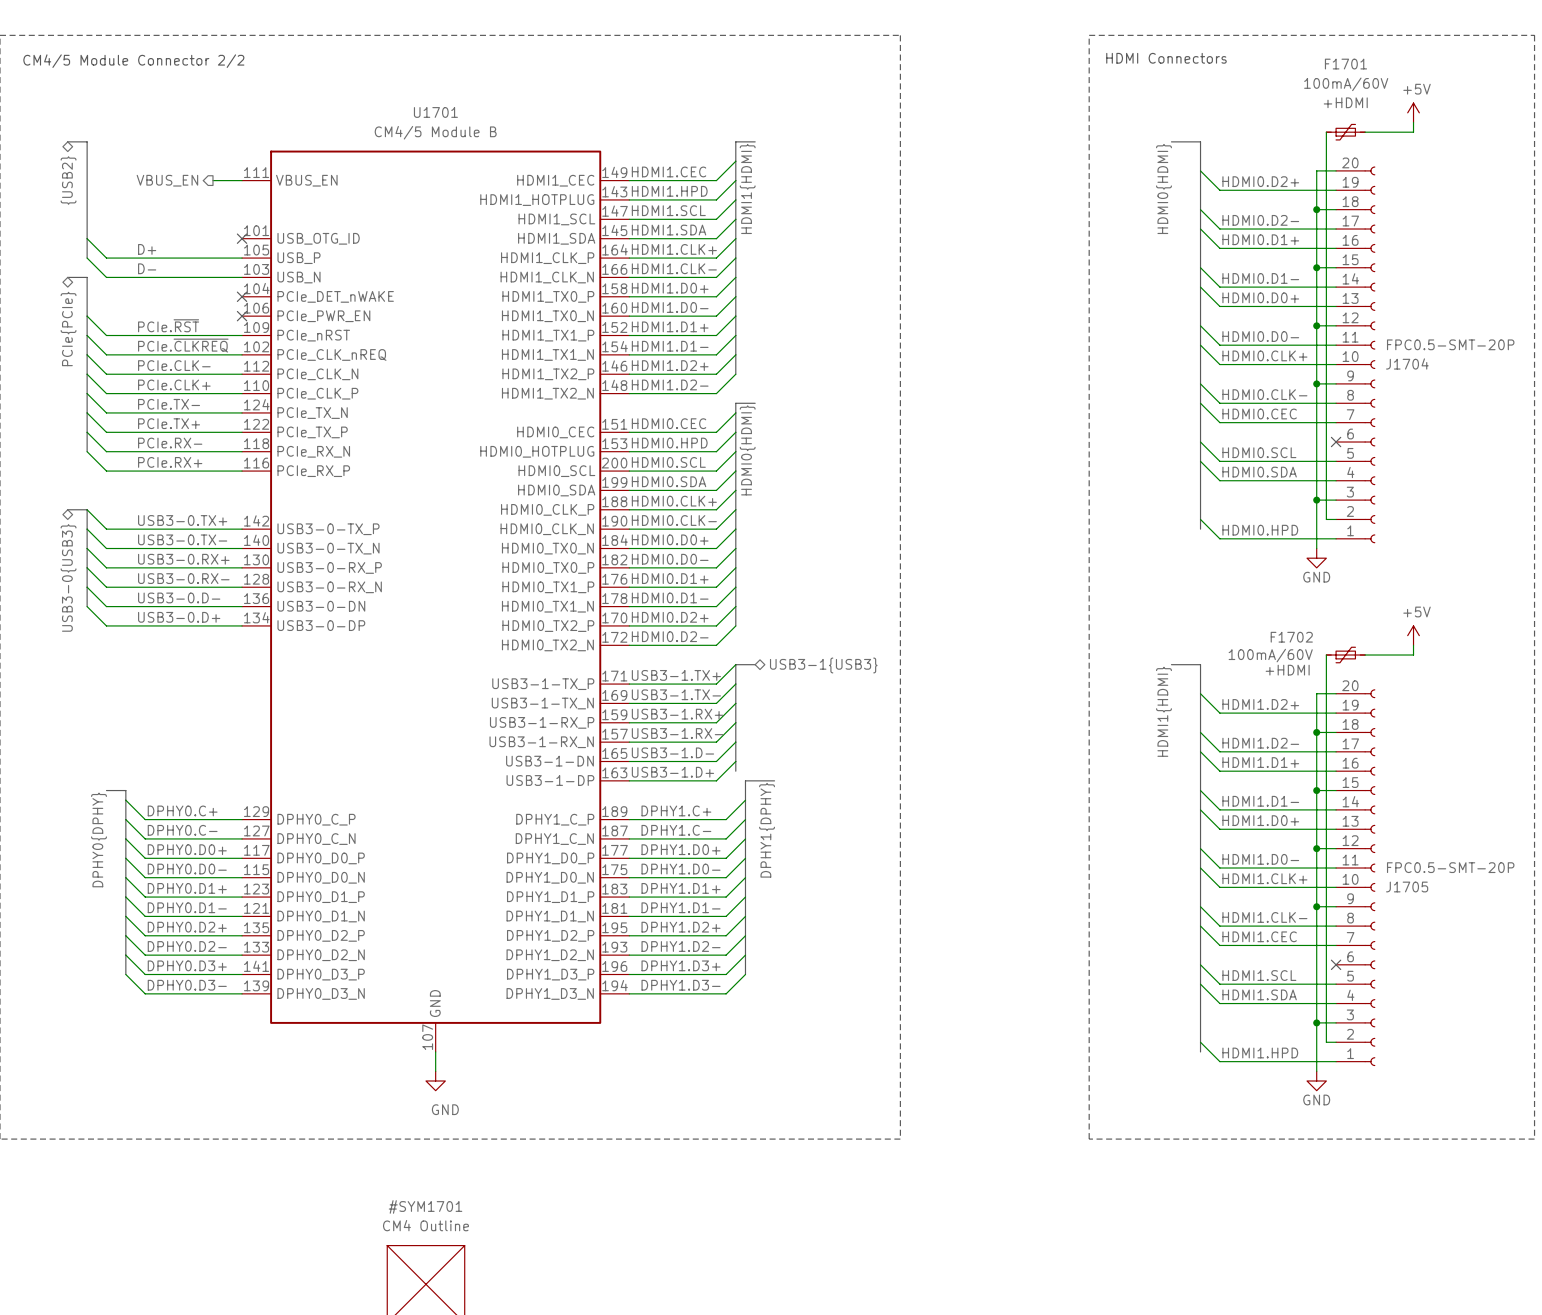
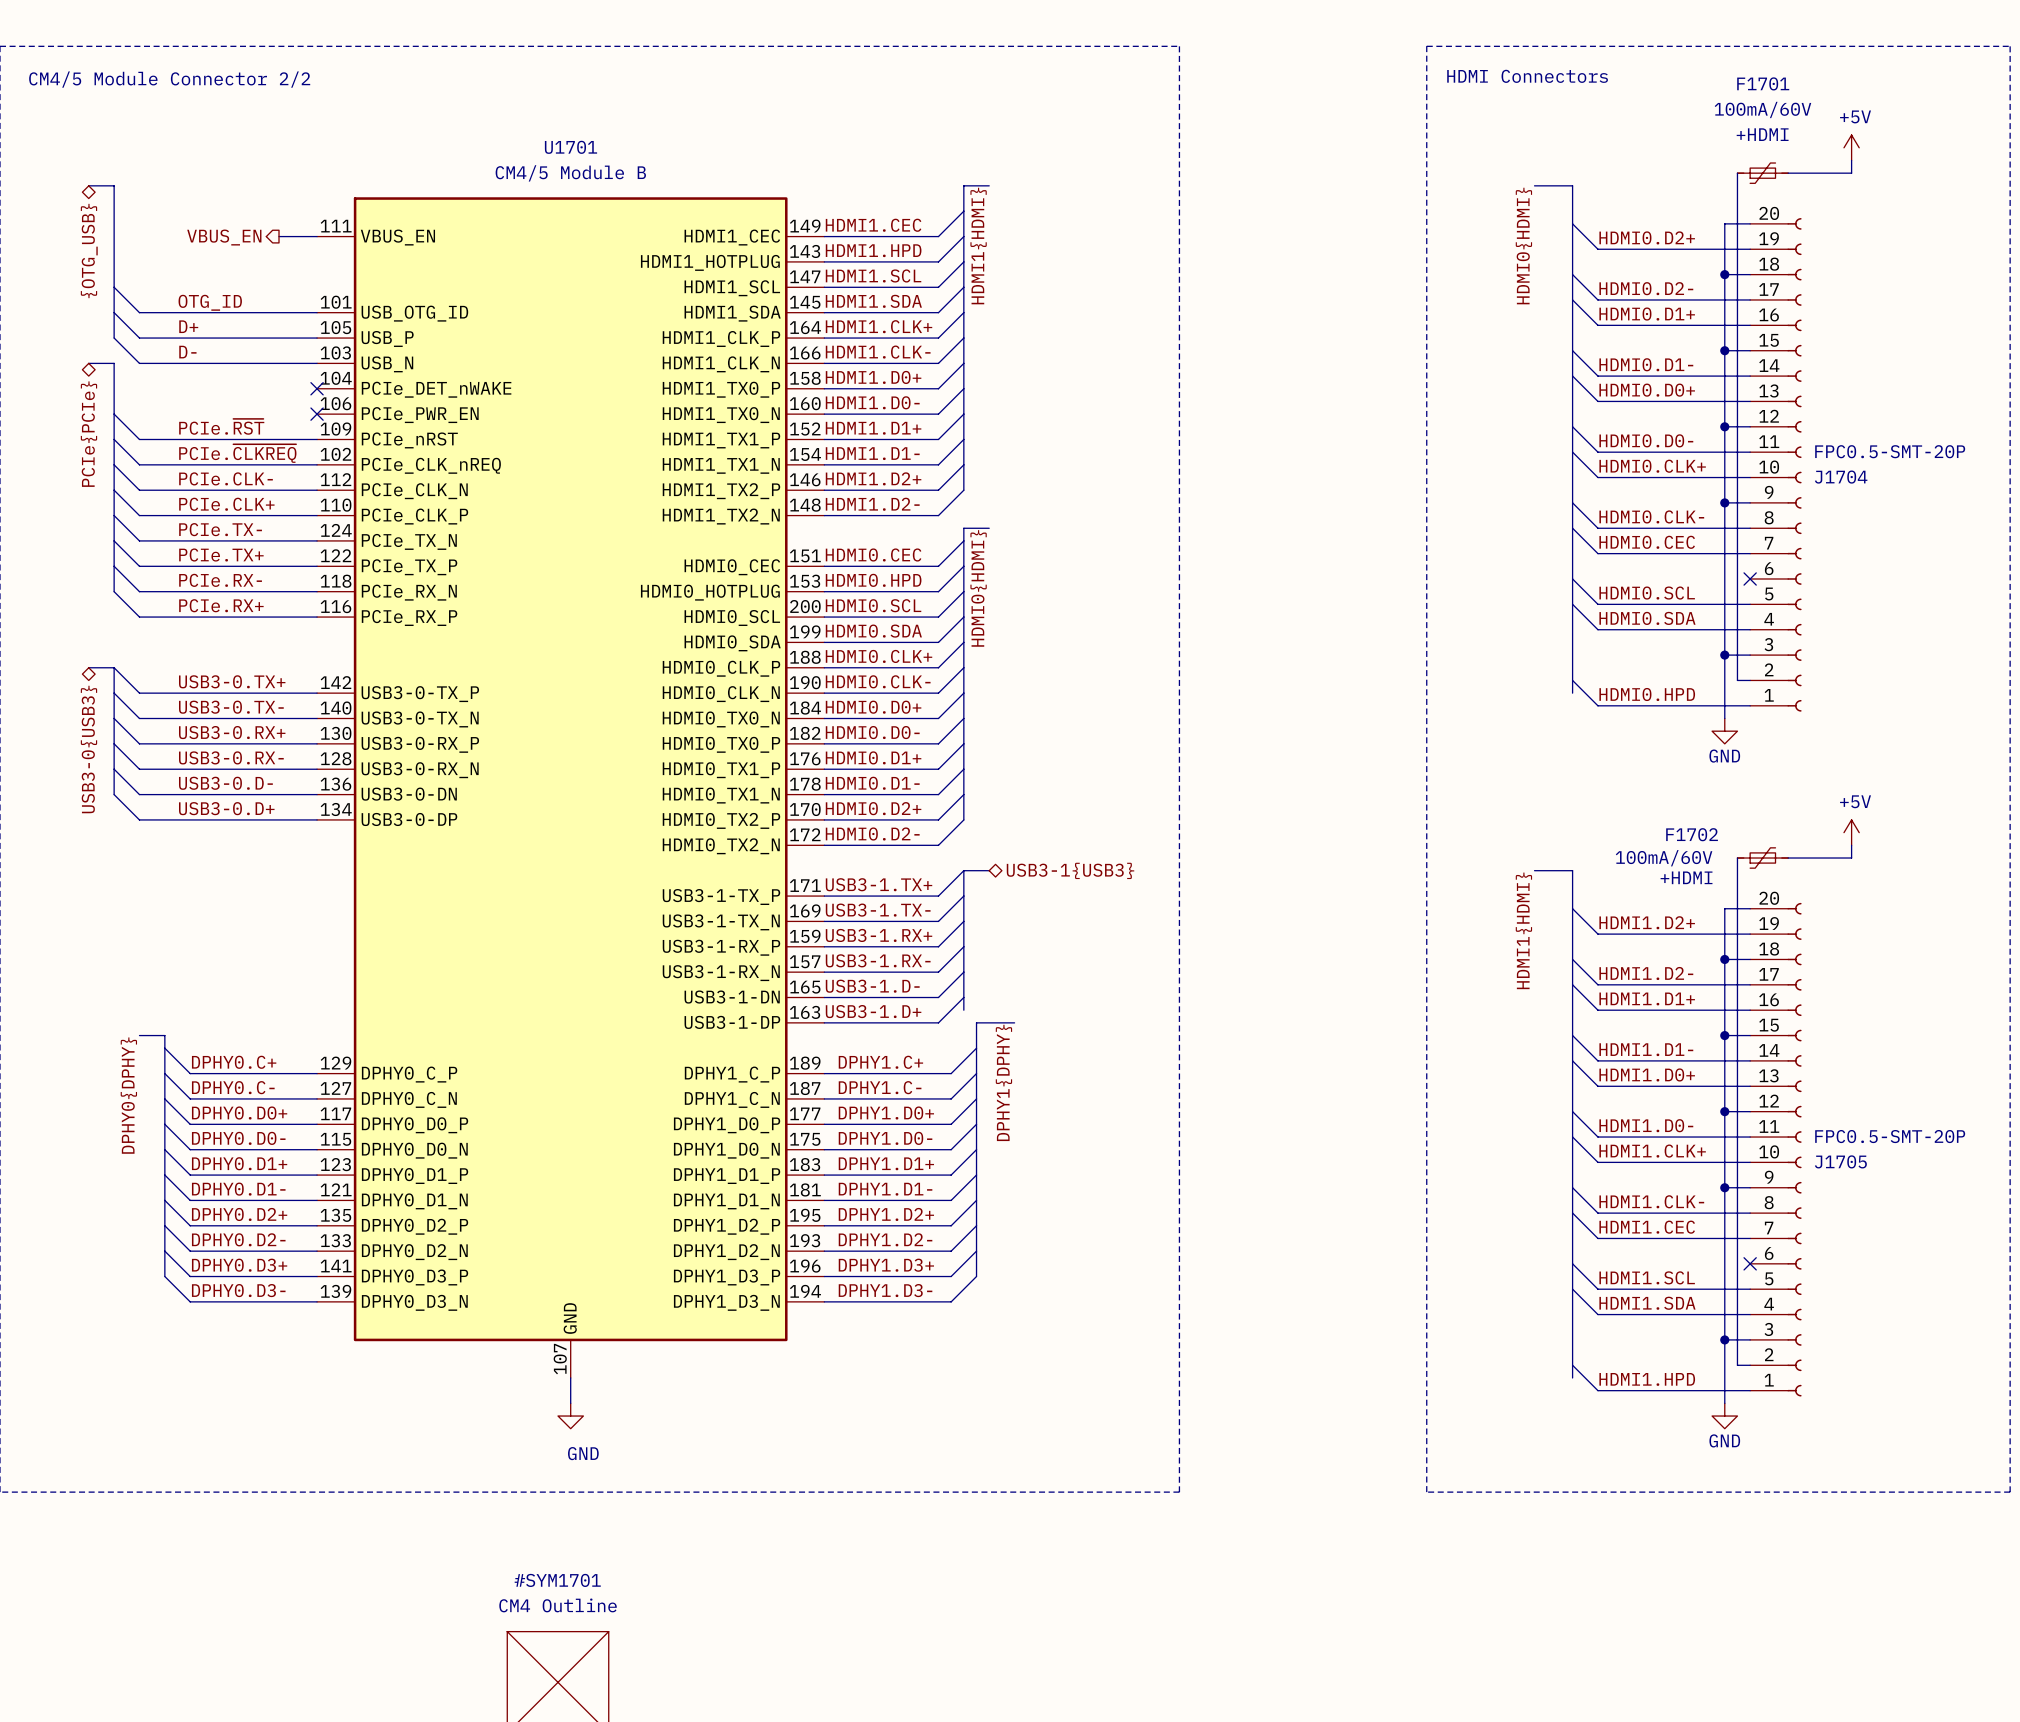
hierarchical label: {USB2} (68, 180) -> {OTG_USB} (89, 251)
wire: none -> (114, 287) (139, 312) (317, 312)
label: none -> OTG_ID (210, 302)
no-connect mark: (242, 238) -> none

